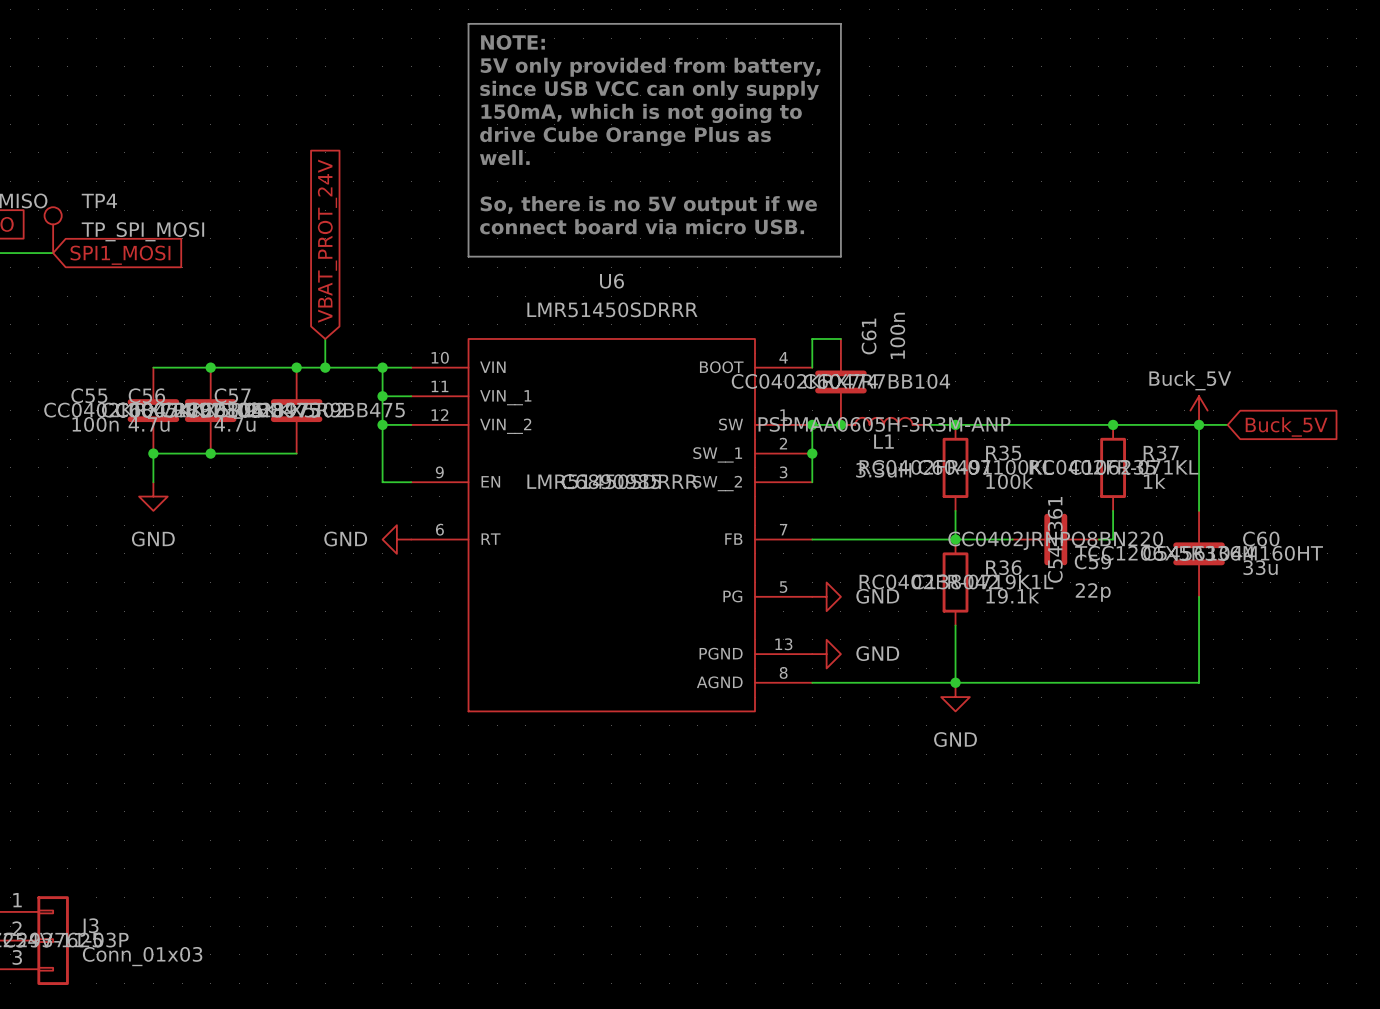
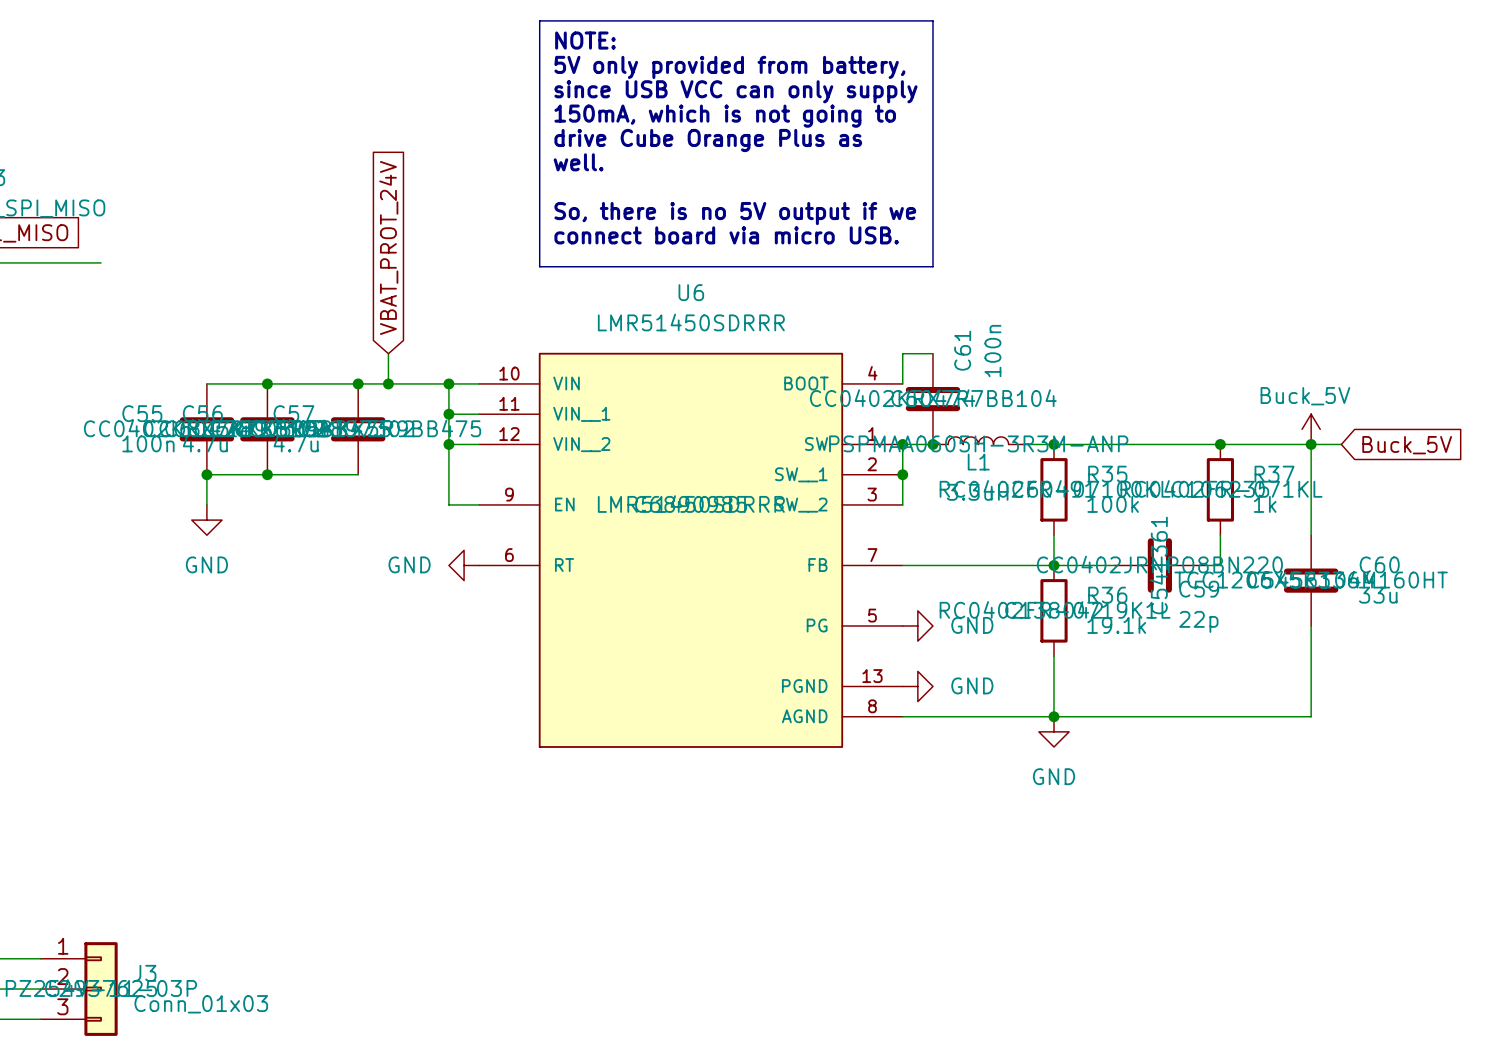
TP4: TP_SPI_MOSI (53, 230) -> none
global label: SPI1_MOSI (120, 255) -> none

